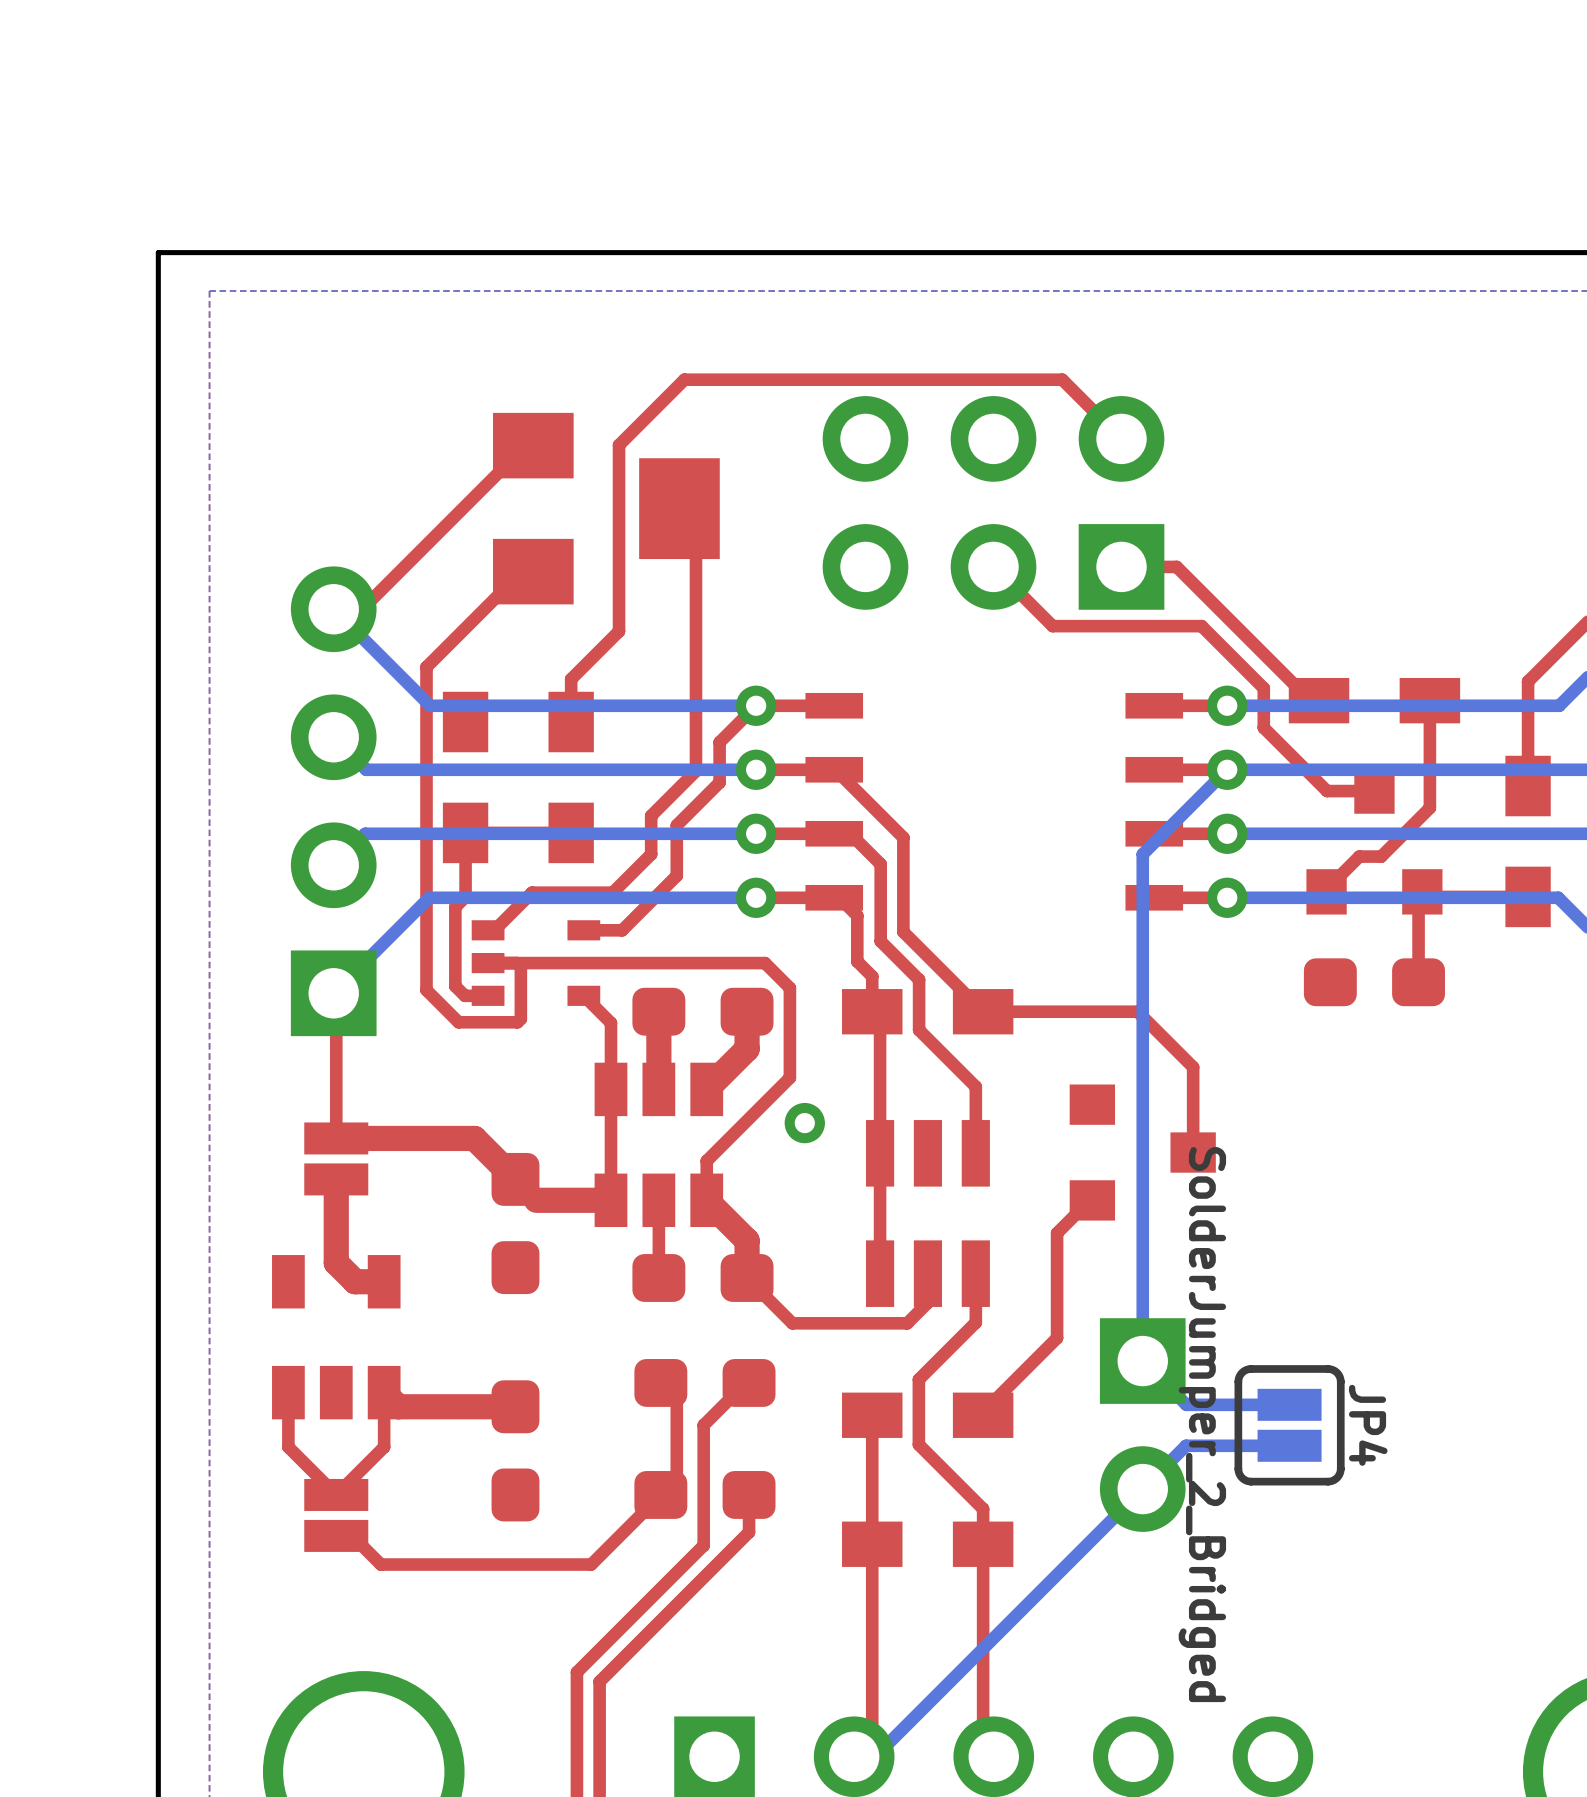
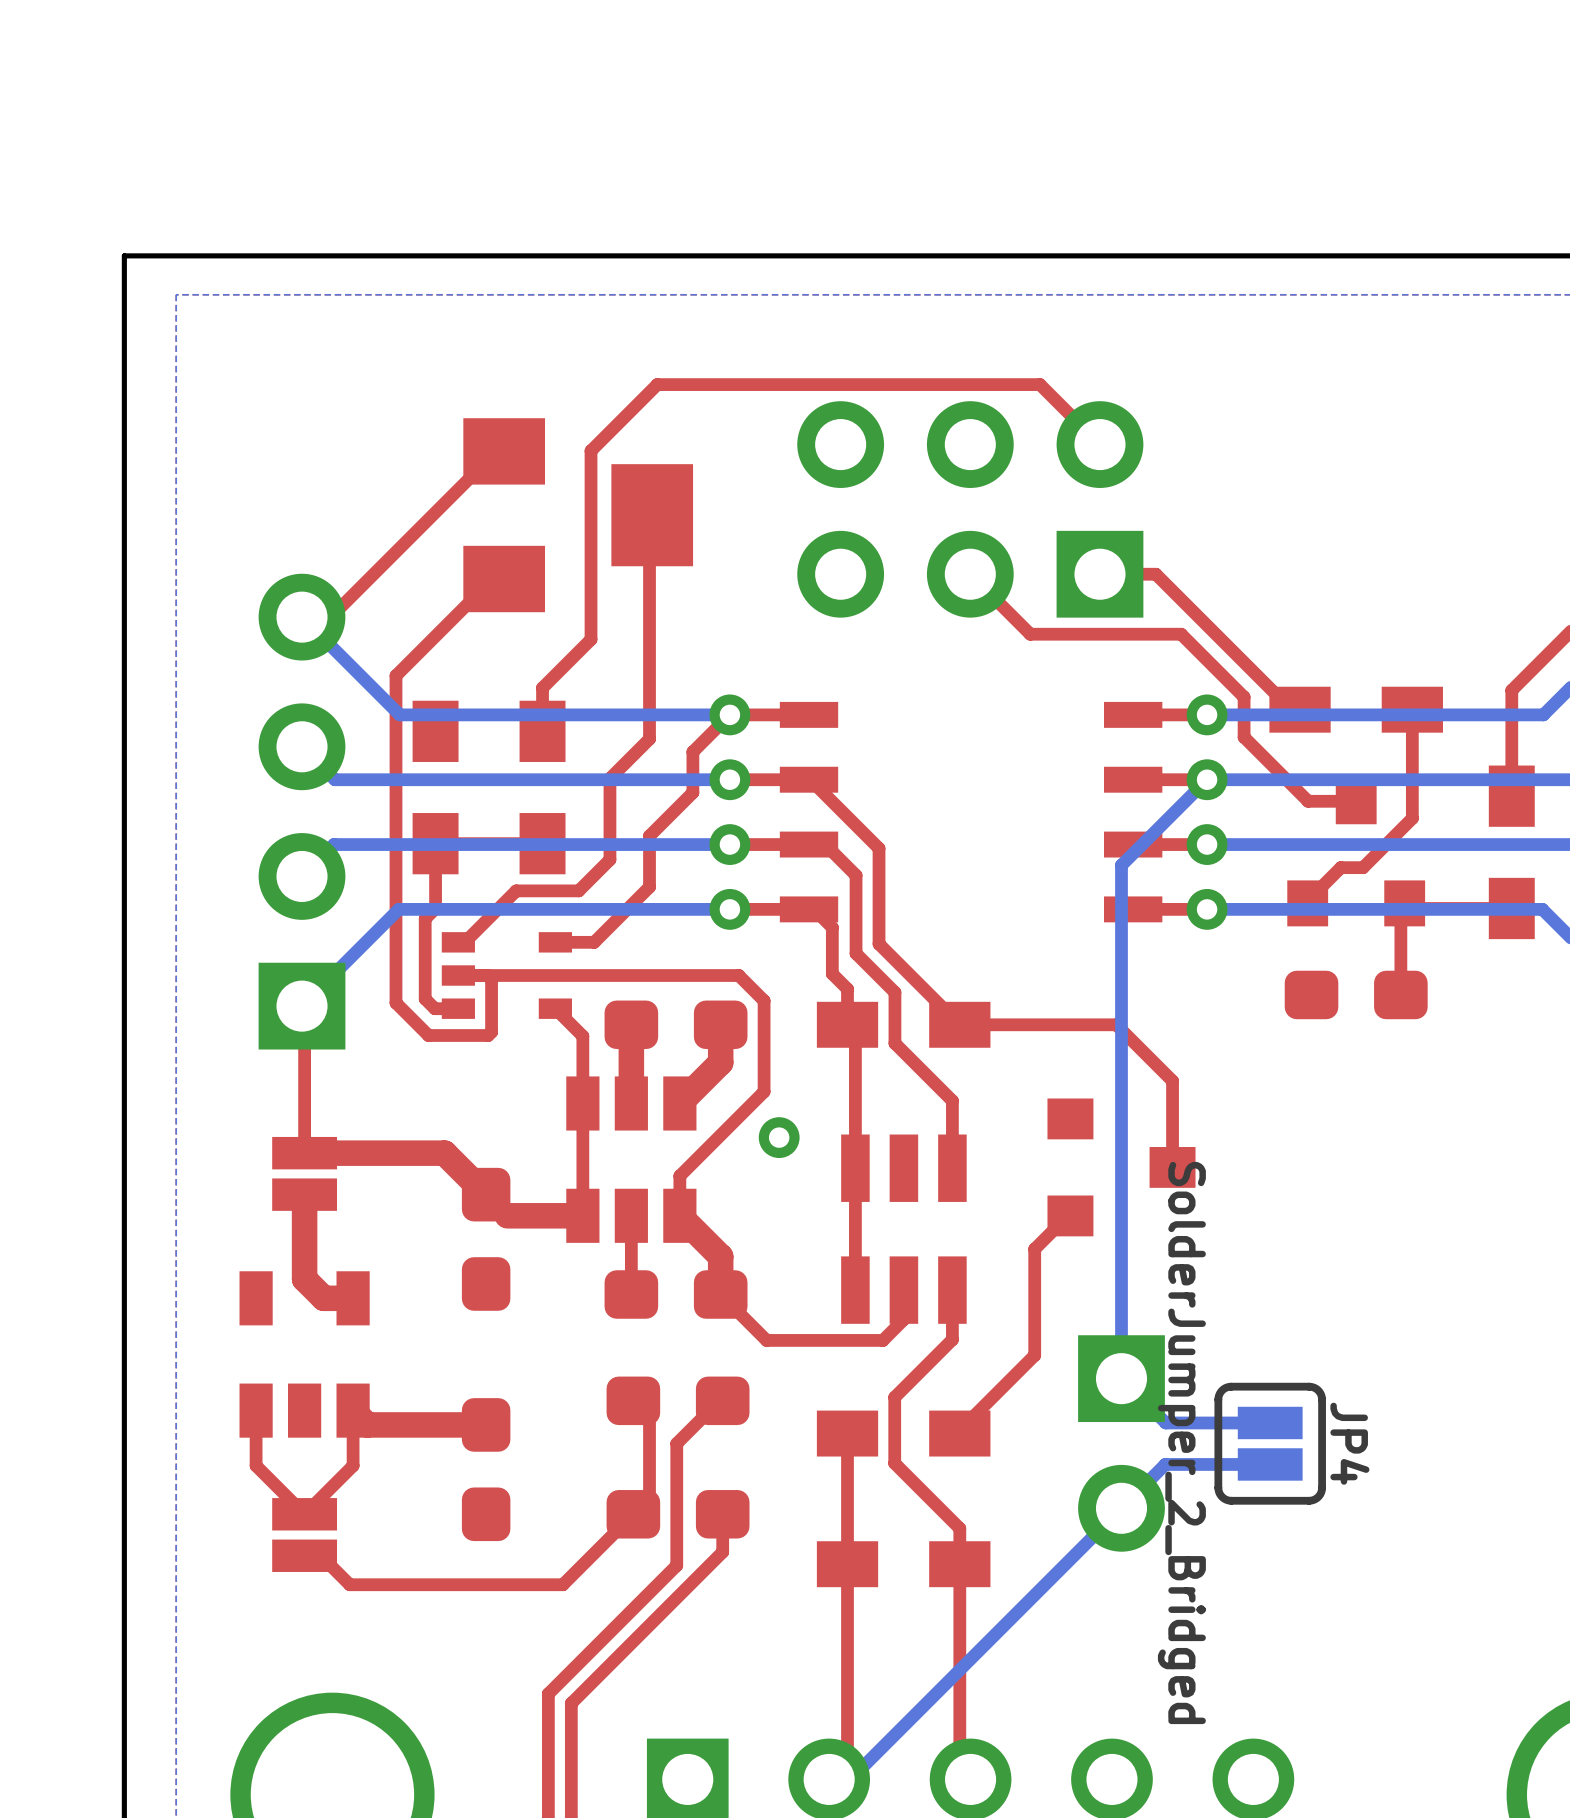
top track: (676, 509) (695, 528) (695, 771) (651, 815) (651, 854) (612, 892) (532, 892) -> (649, 516) (649, 739) (609, 778) (609, 859) (578, 890) (516, 890) (502, 904)

